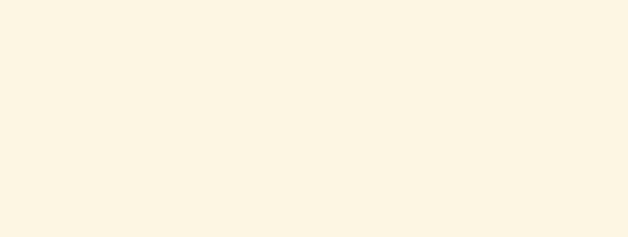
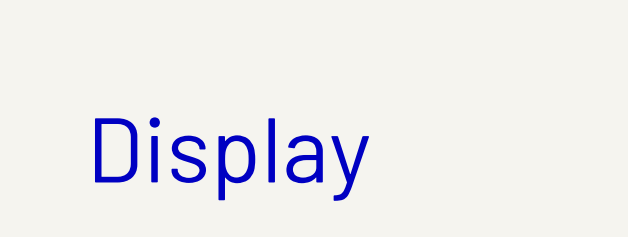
text: none -> Display (232, 159)

